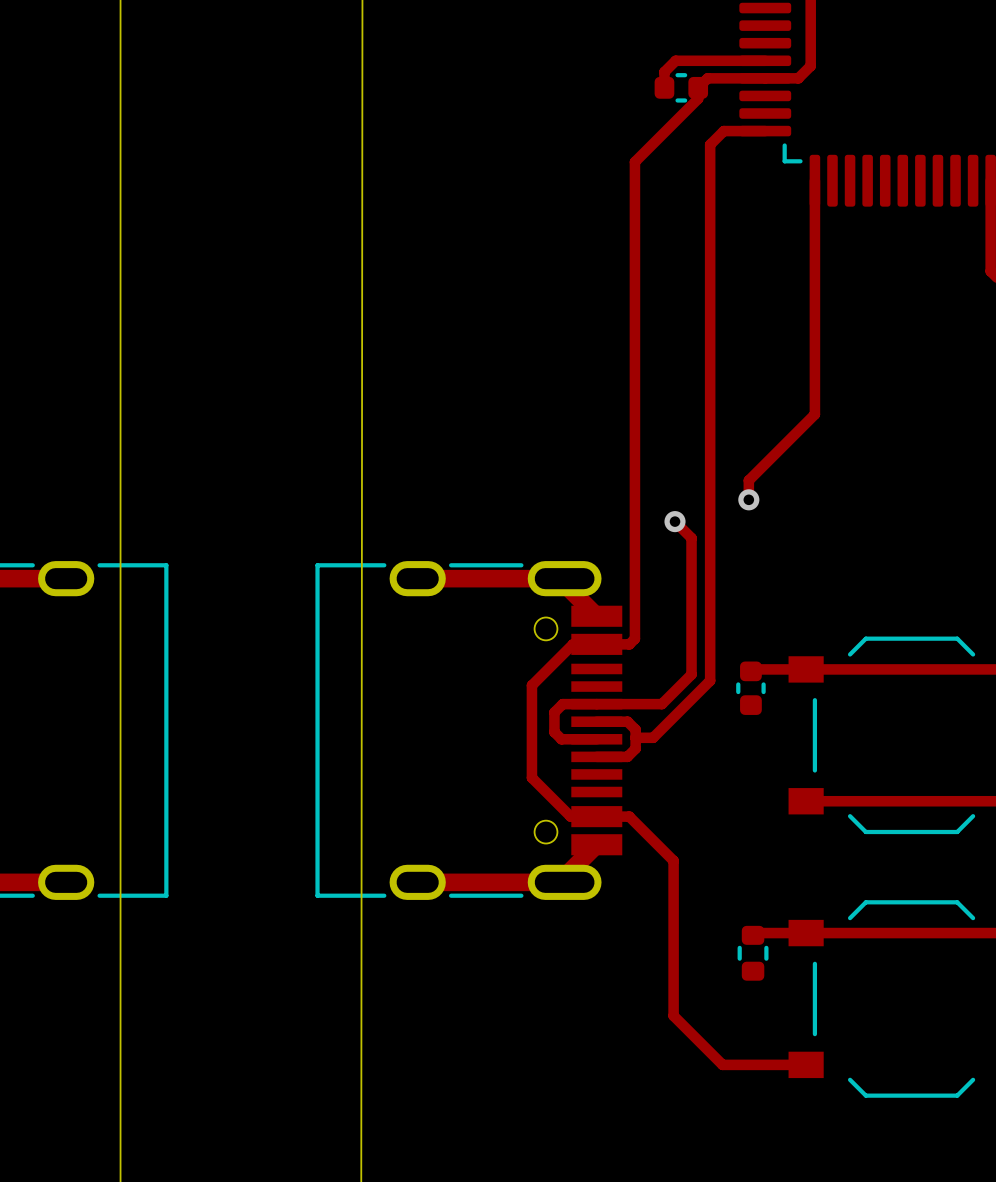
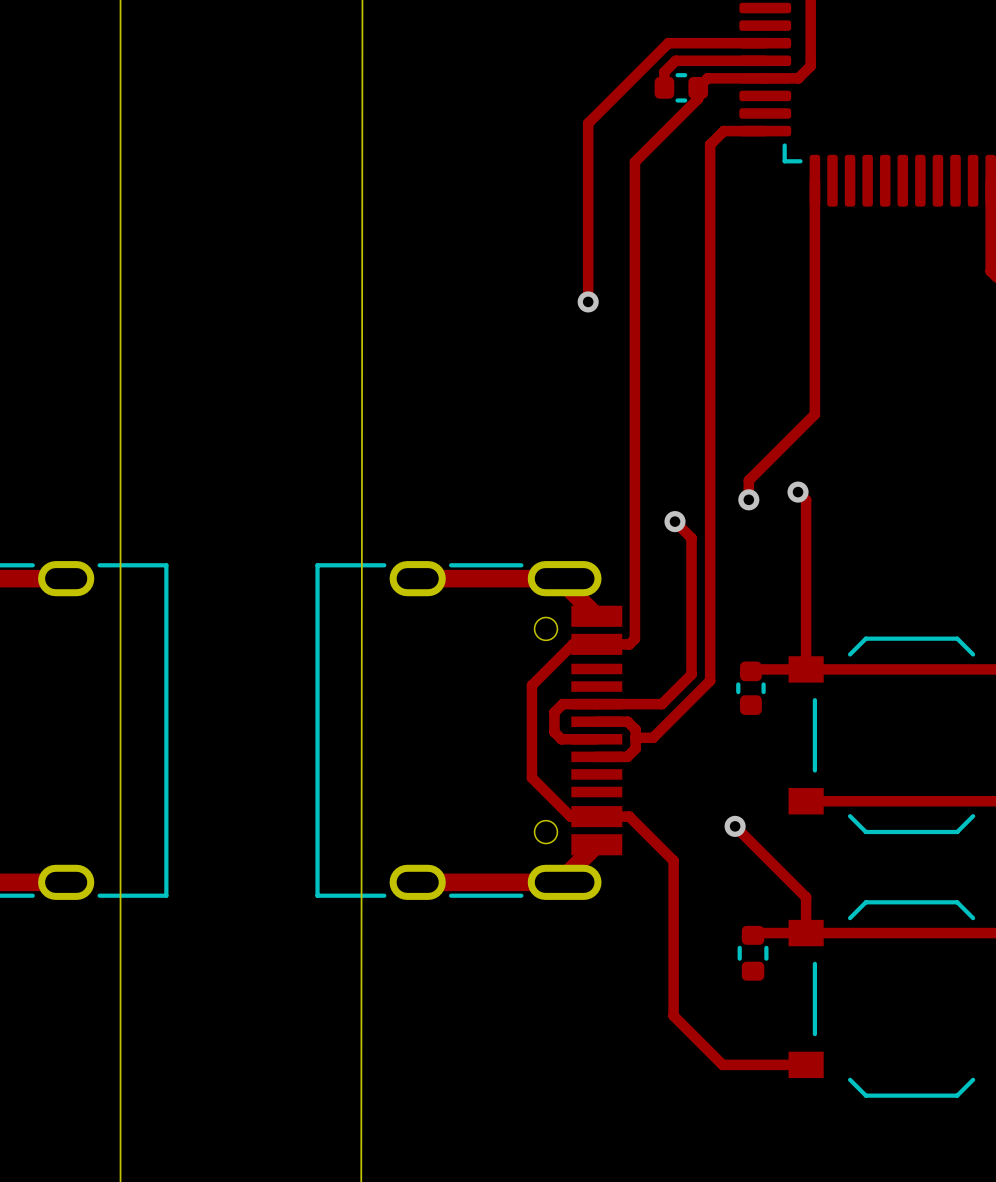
track: none -> (765, 43) (668, 43) (588, 123) (588, 301)
via: none -> (588, 301)
track: none -> (798, 492) (806, 500) (806, 669)
via: none -> (798, 492)
track: none -> (735, 826) (806, 897) (806, 933)
via: none -> (735, 826)

